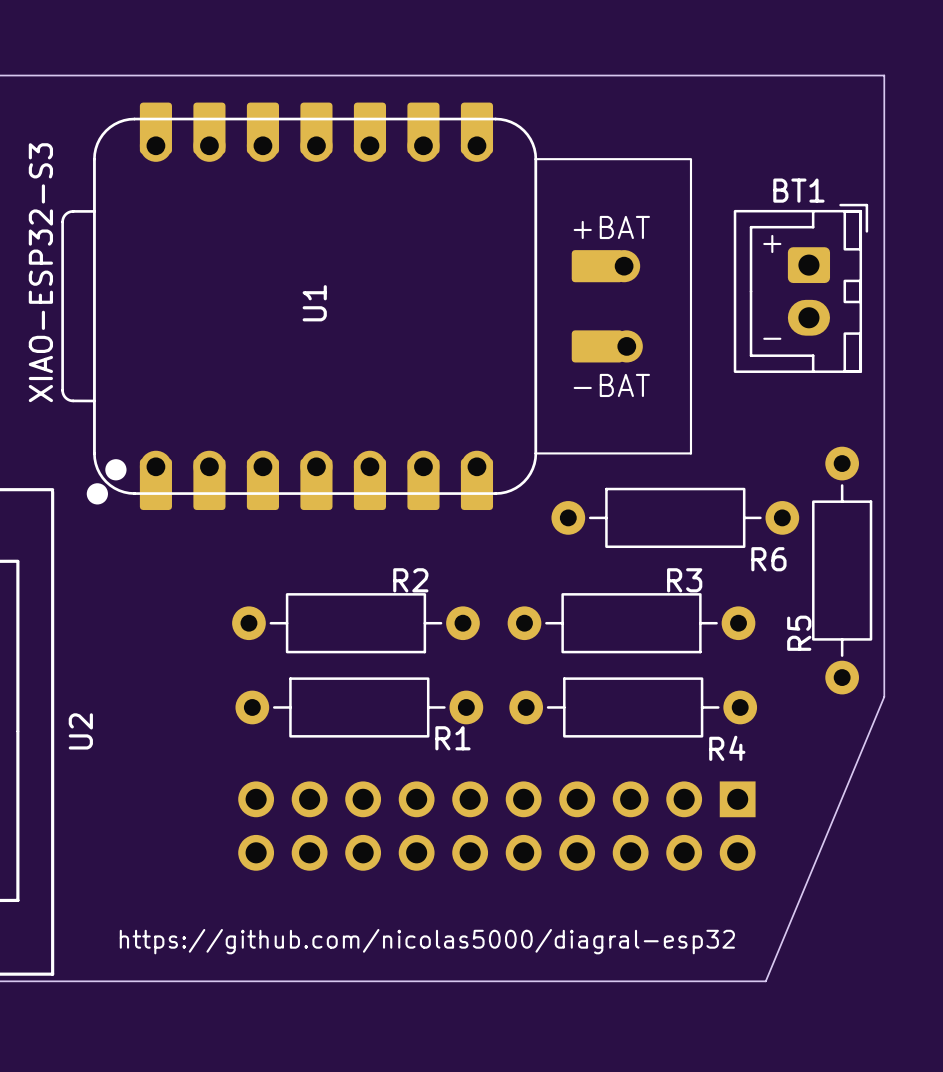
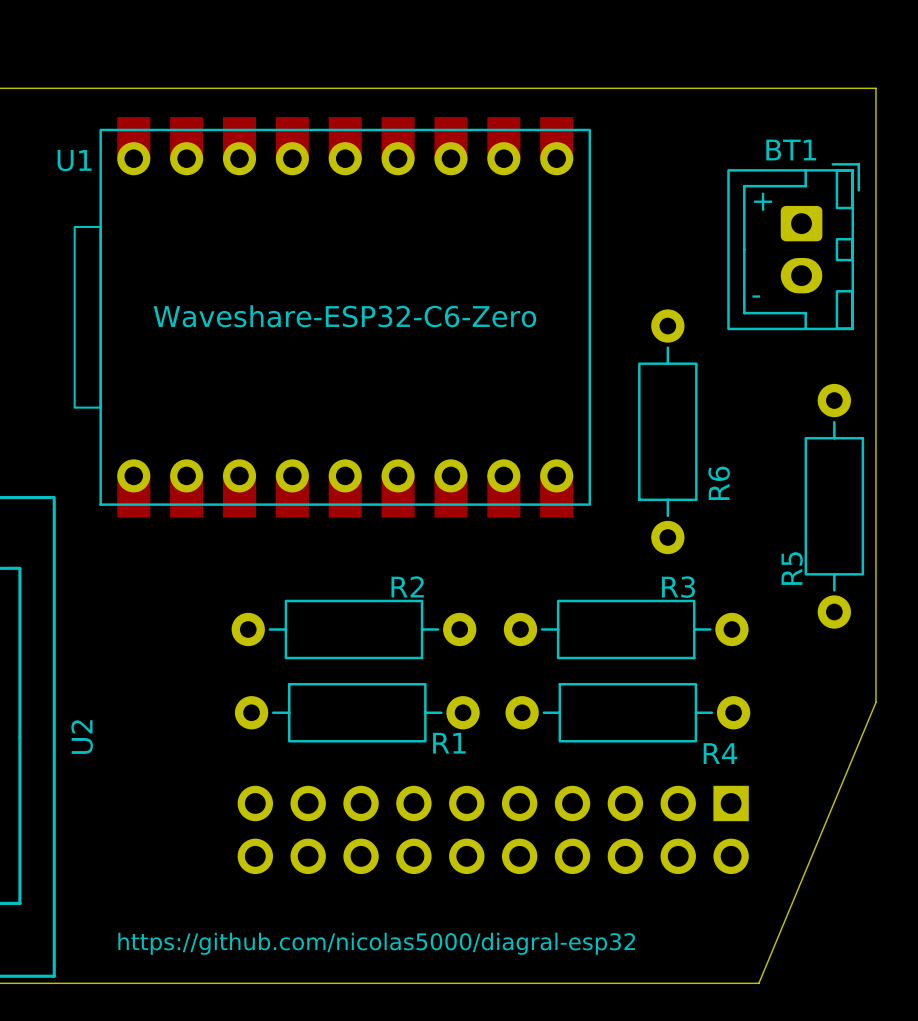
U1 footprint: [61, 102, 693, 511] -> [73, 117, 592, 518]
text position: + (772, 243) -> + (763, 201)
U1 value: XIAO-ESP32-S3 (40, 272) -> Waveshare-ESP32-C6-Zero (344, 316)
BT1 position: (800, 288) -> (793, 246)
U1 name position: U1 (314, 303) -> U1 (74, 160)
text position: - (772, 338) -> - (756, 296)
R6 rotation: 0° (675, 517) -> 90° clockwise (667, 431)
R5 position: (842, 570) -> (834, 506)

